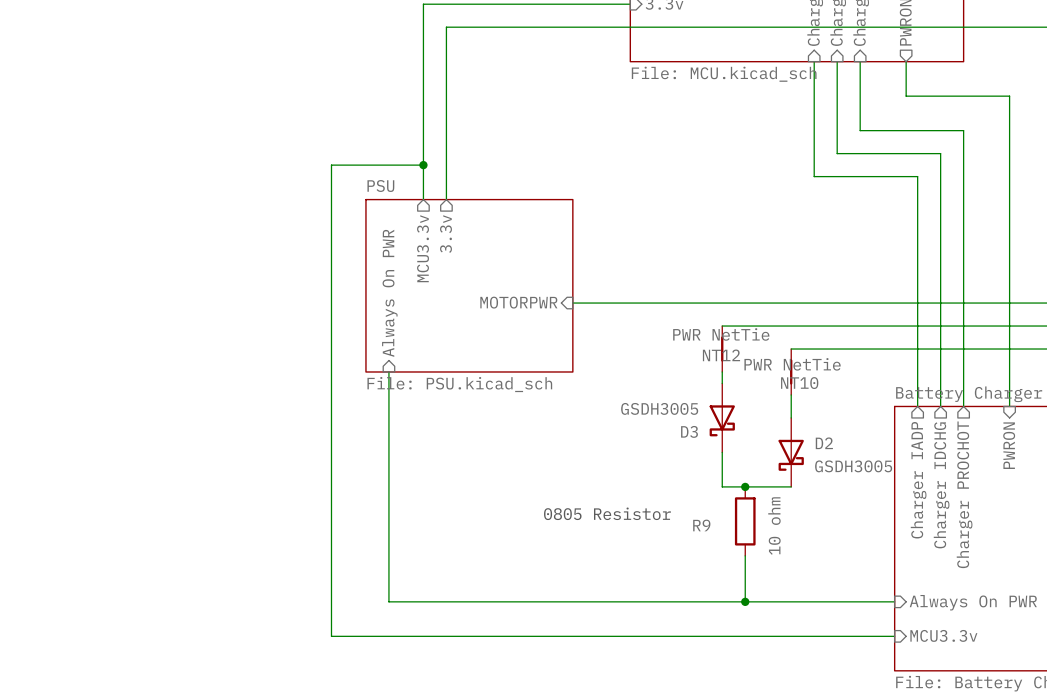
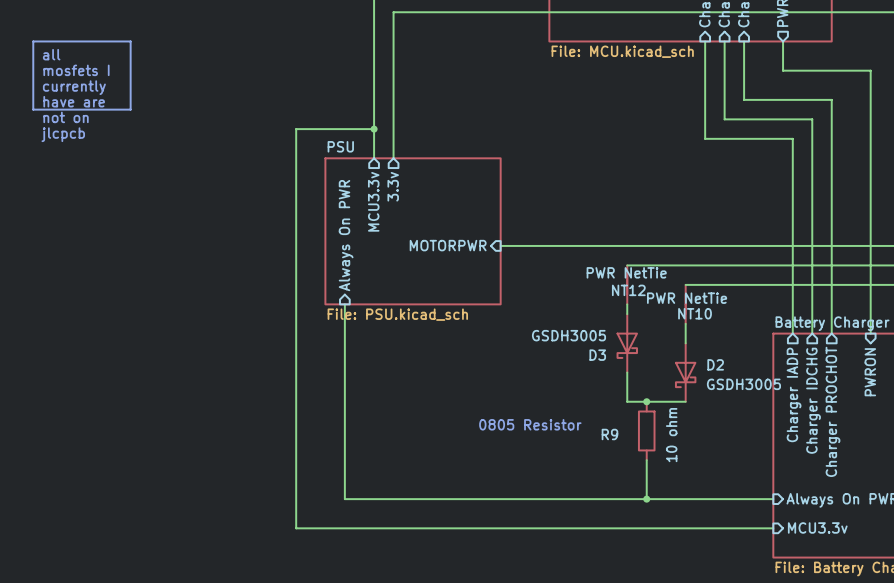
line: none -> (33, 41) (33, 109) (130, 109) (130, 41) (33, 41)
text: none -> all (51, 54)
text: none -> mosfets I (76, 70)
text: none -> currently (74, 87)
text: none -> have are (74, 101)
text: none -> not on (66, 117)
text: none -> jlcpcb (63, 134)

